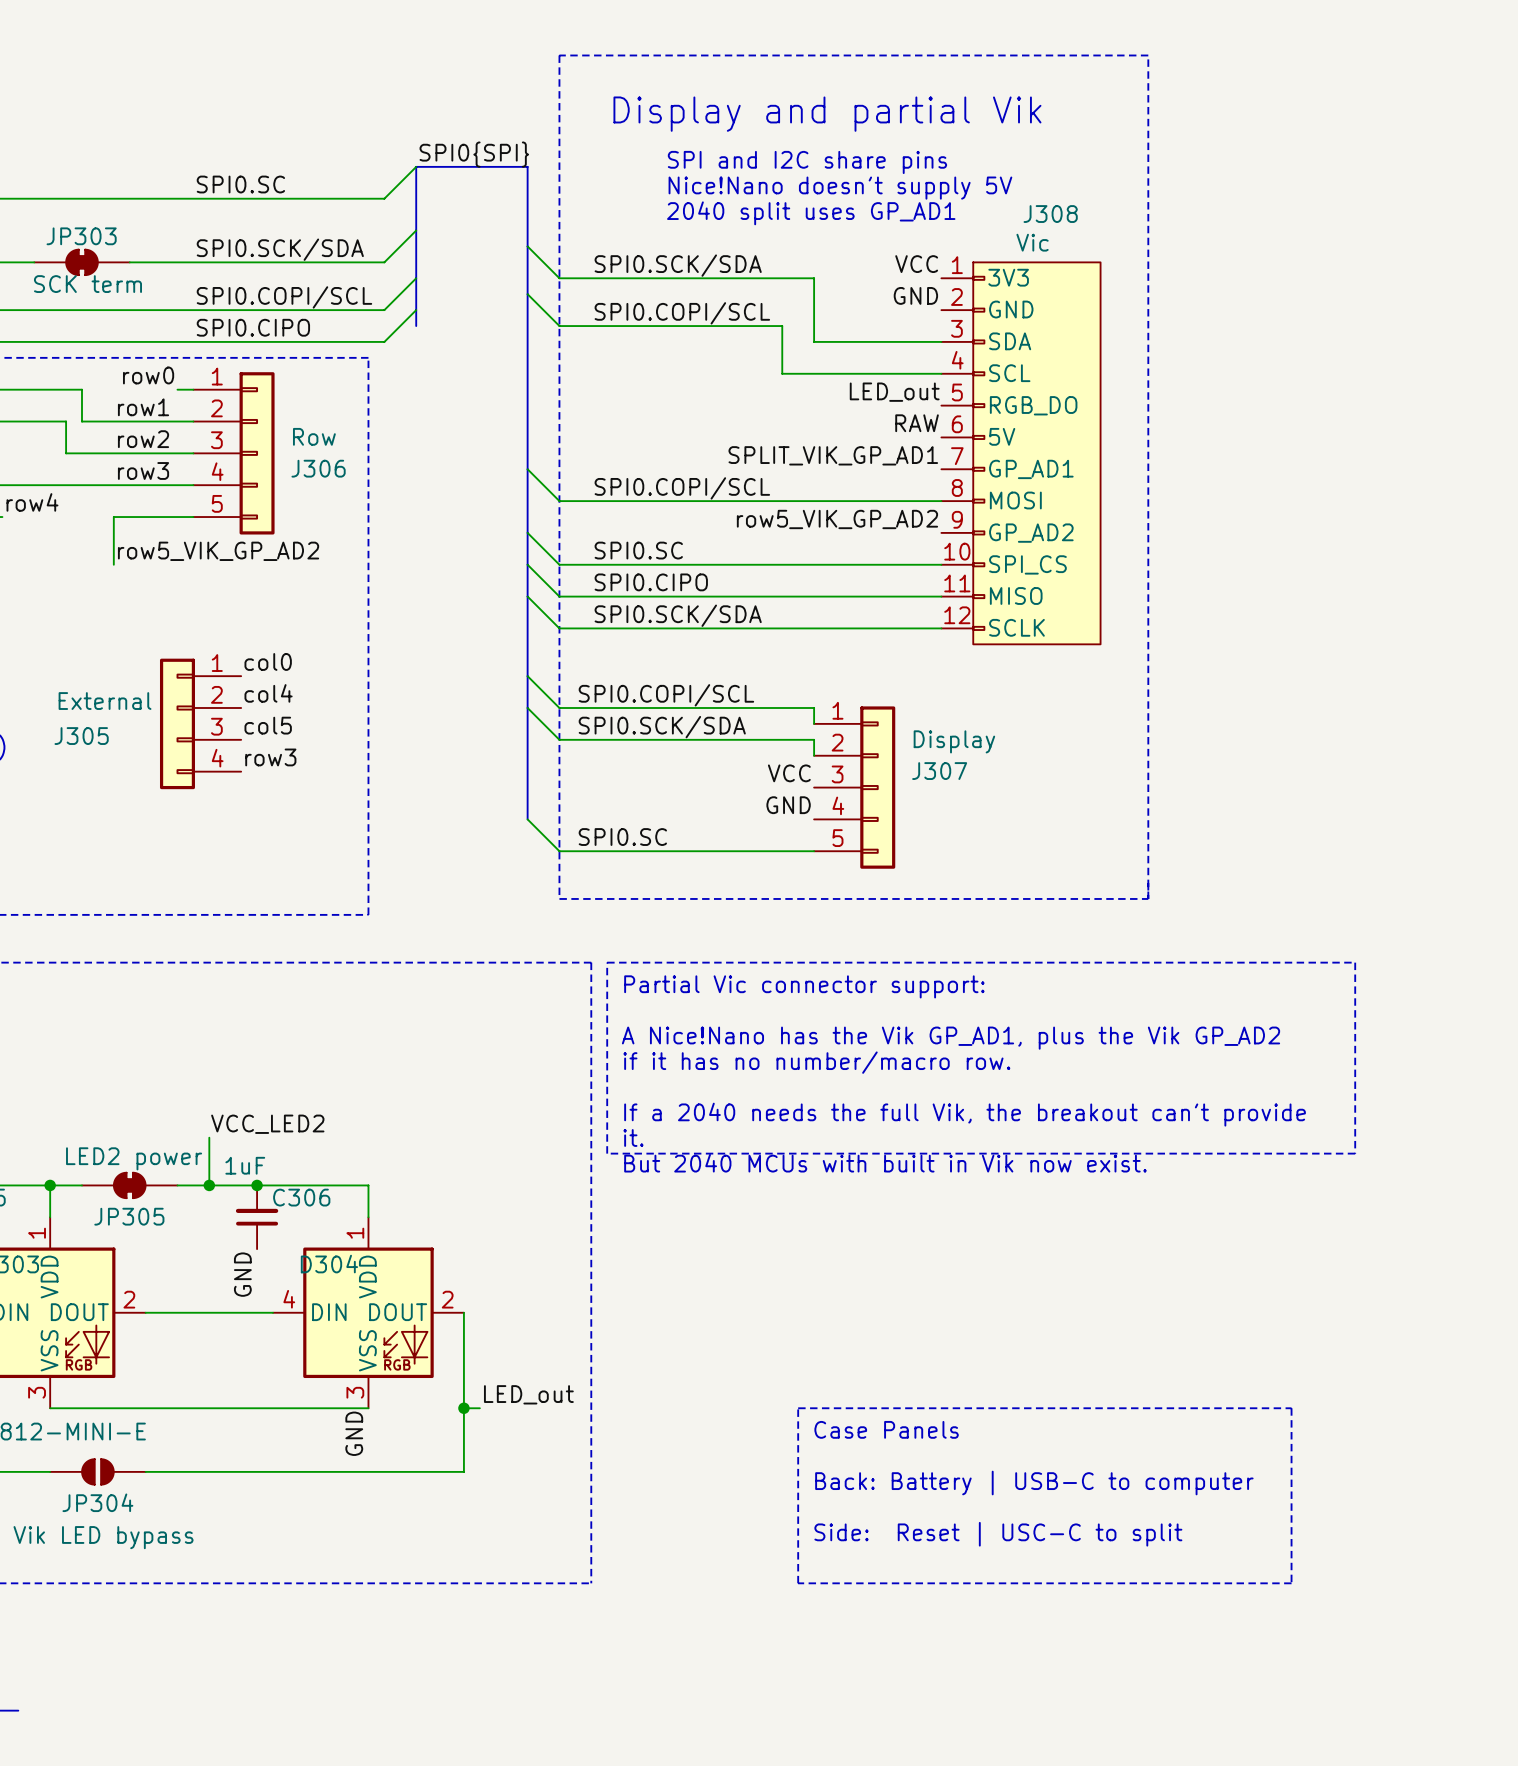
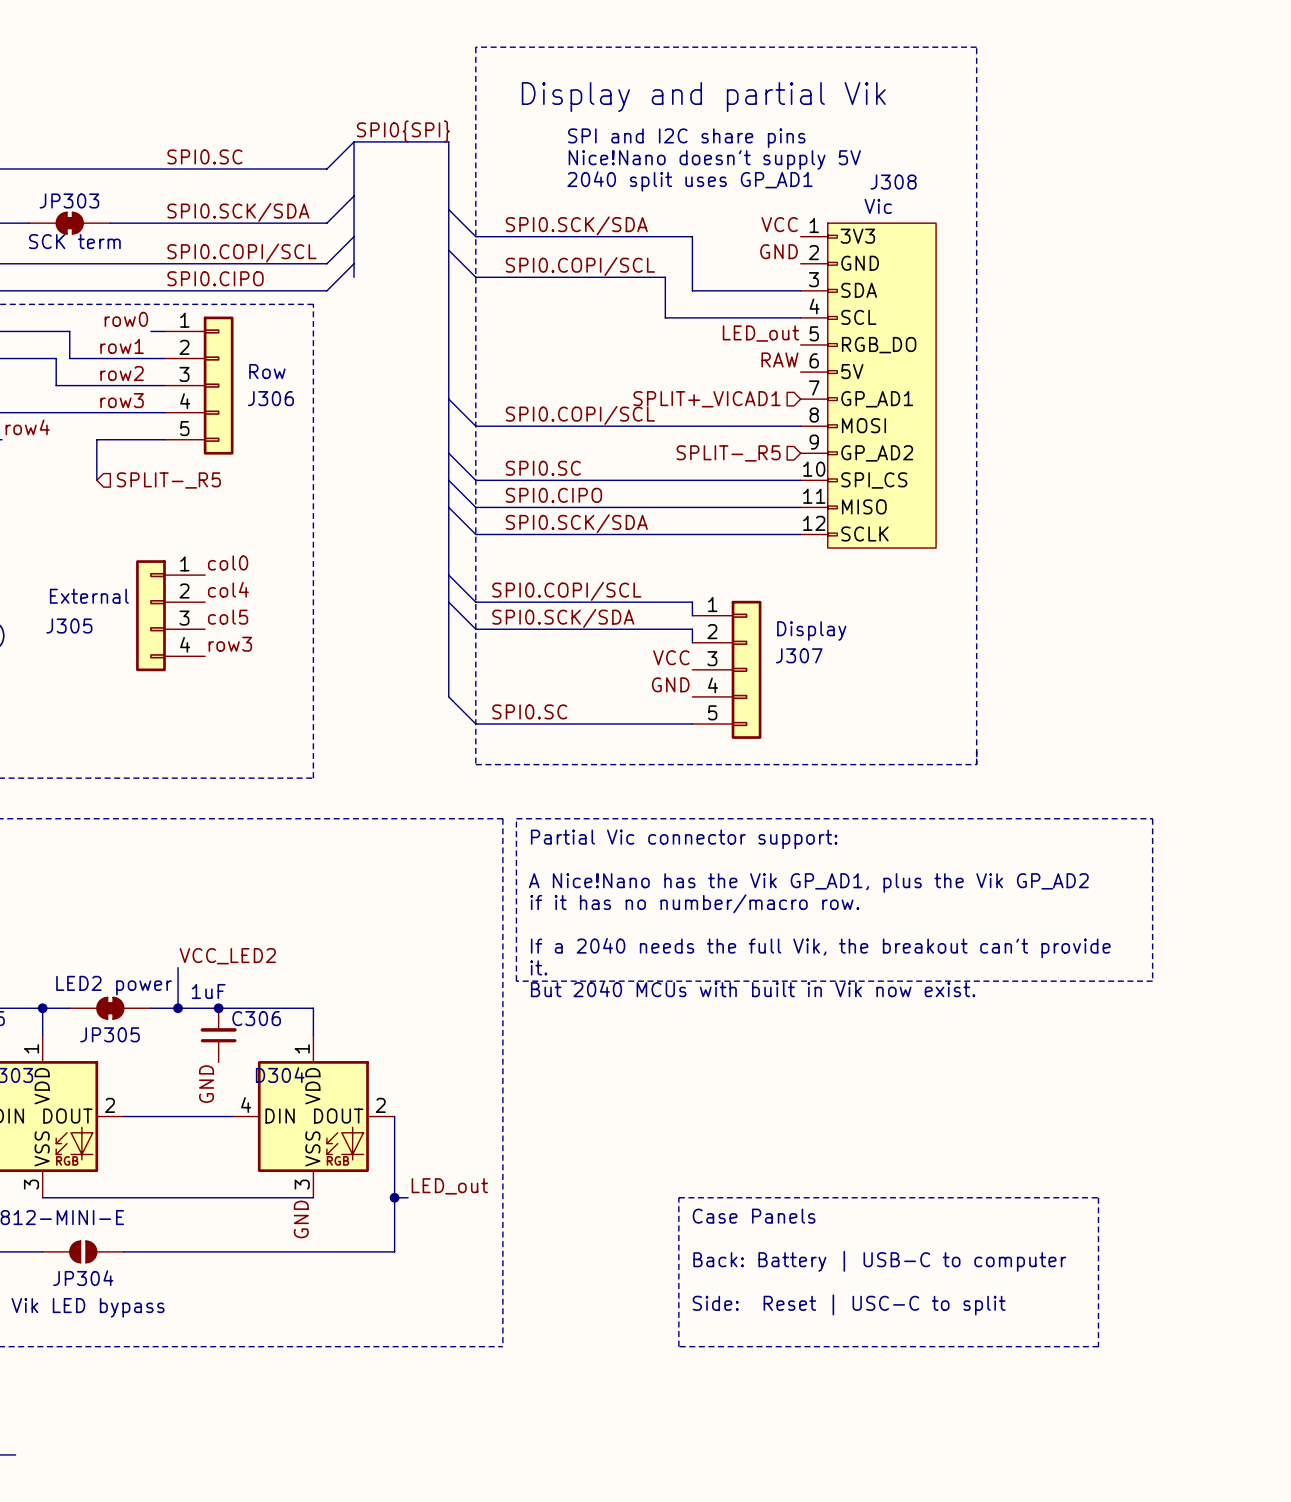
label: SPLIT_VIK_GP_AD1 (833, 455) -> none
hierarchical label: none -> SPLIT+_VICAD1 (707, 399)
label: row5_VIK_GP_AD2 (837, 519) -> none
hierarchical label: none -> SPLIT-_R5 (728, 453)
label: row5_VIK_GP_AD2 (218, 551) -> none
hierarchical label: none -> SPLIT-_R5 (168, 480)

